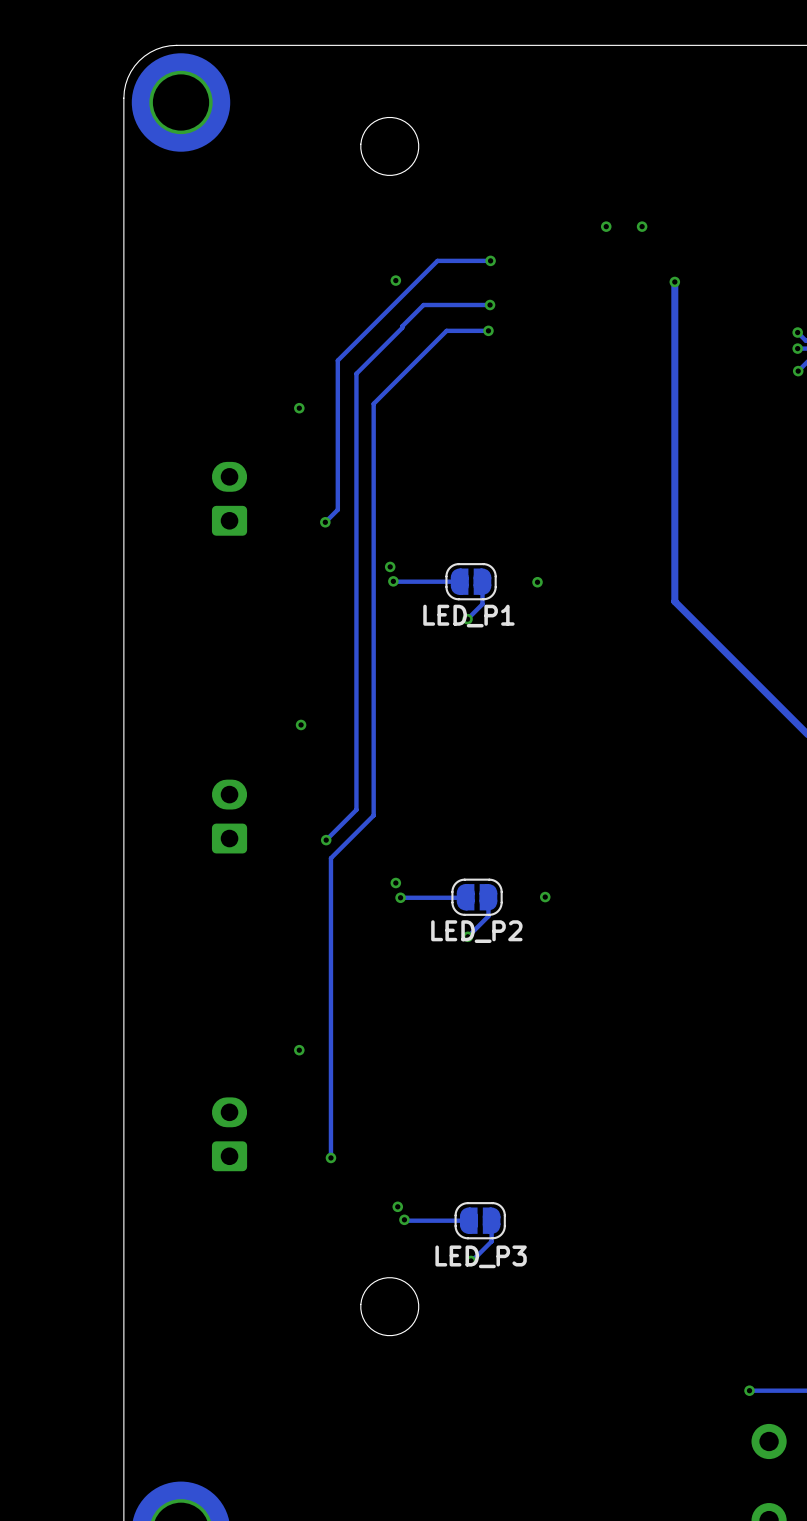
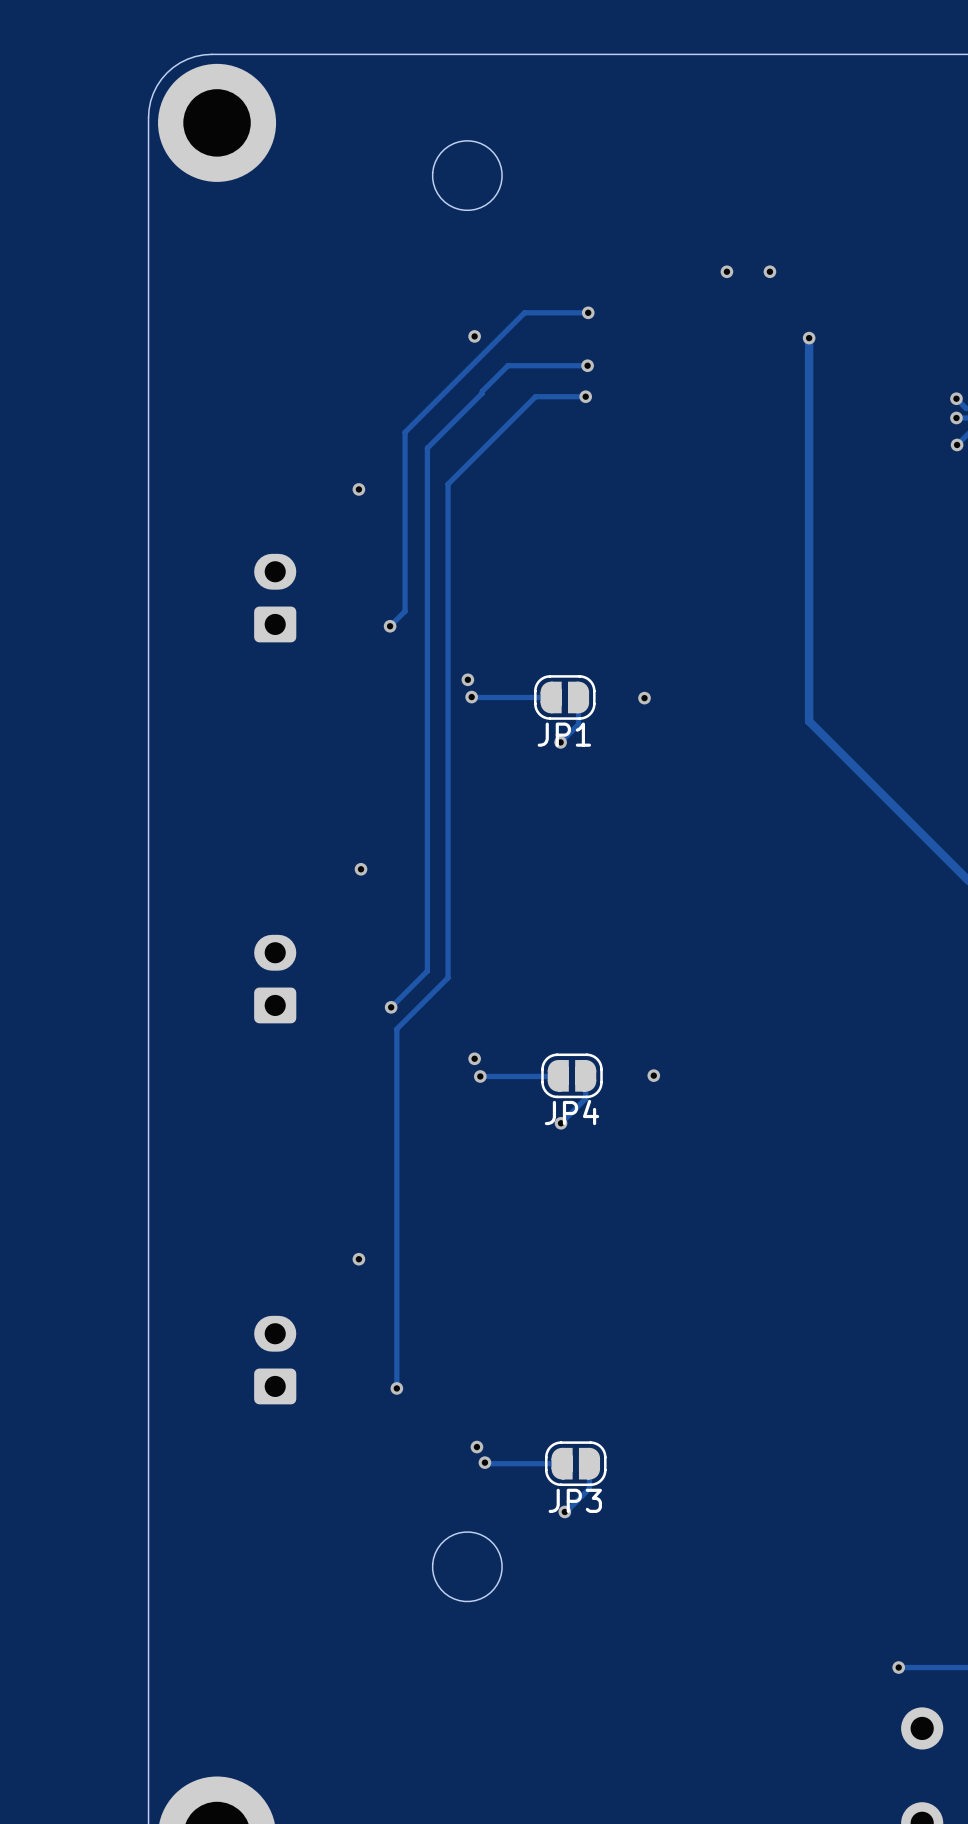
JP1 name: none -> JP1 (564, 734)
text: LED_P1 (468, 616) -> none
JP4 name: none -> JP4 (572, 1112)
text: LED_P2 (476, 931) -> none
JP3 name: none -> JP3 (575, 1500)
text: LED_P3 (481, 1256) -> none

